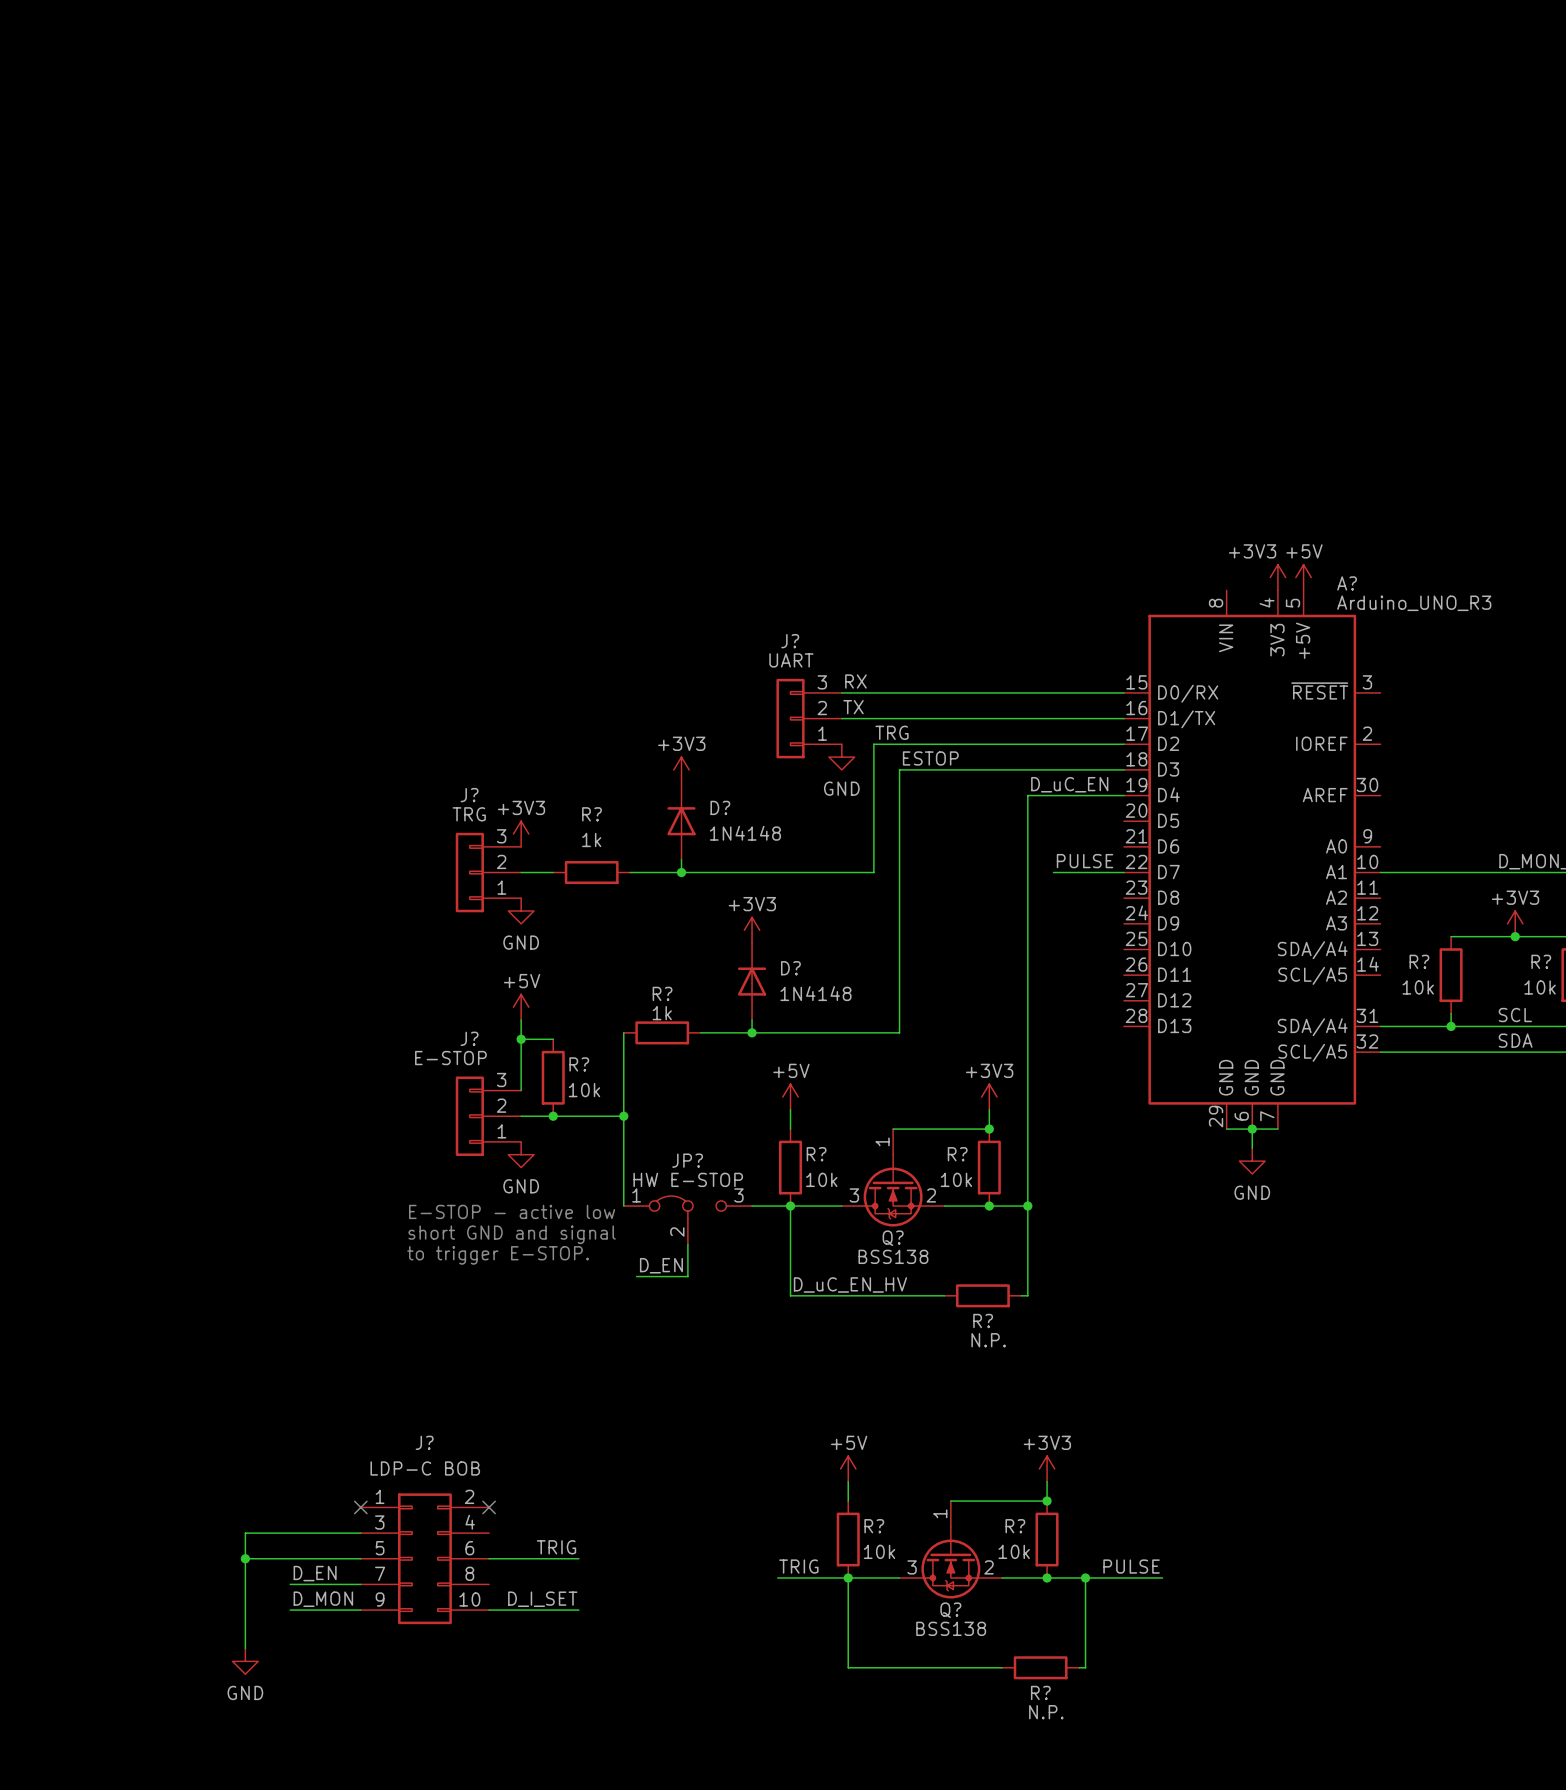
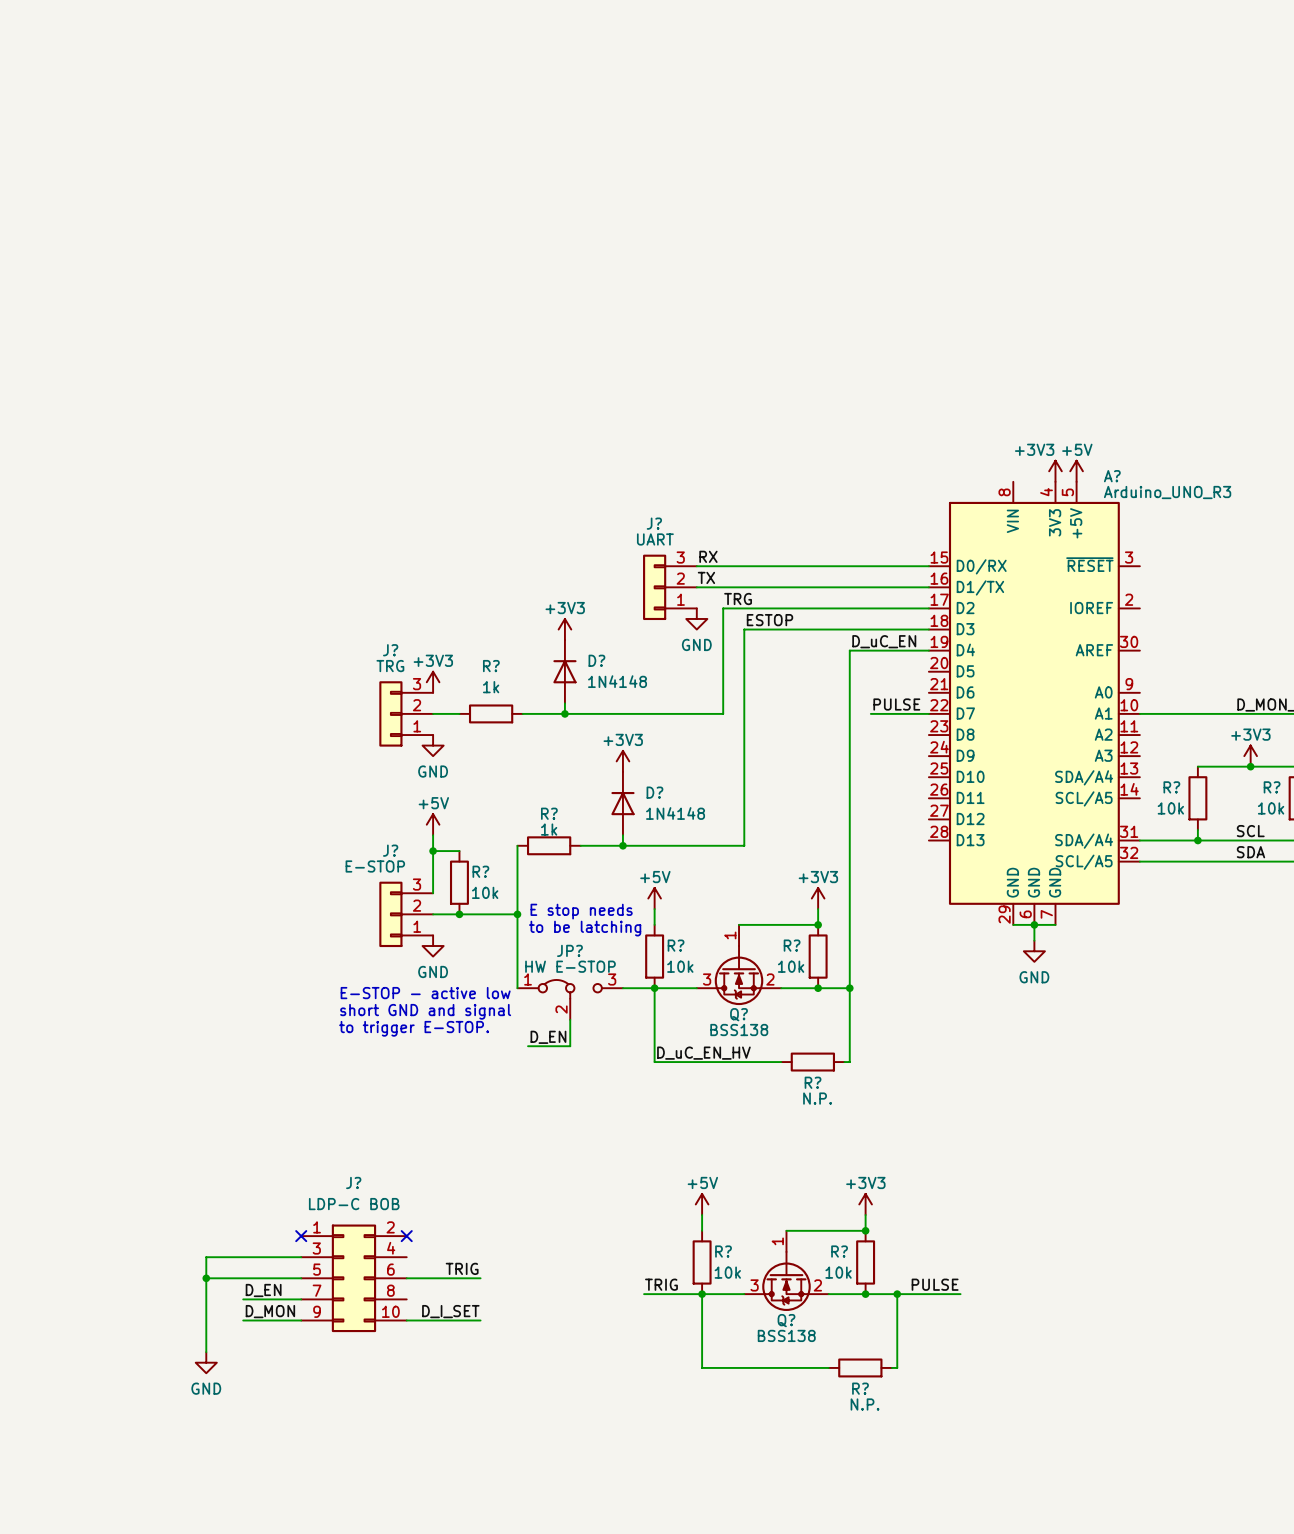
text: none -> E stop needs (581, 911)
text: none -> to be latching (585, 928)

